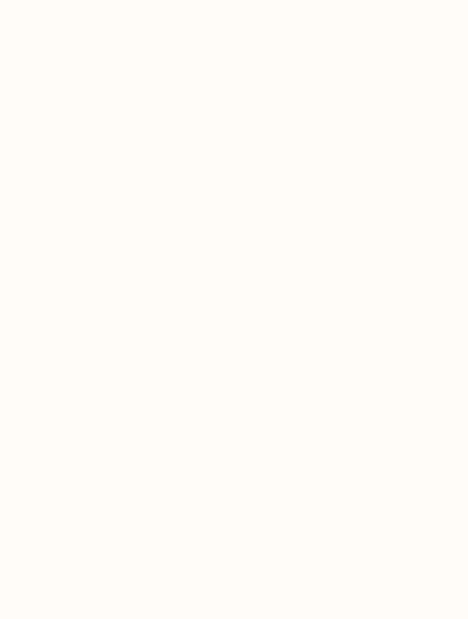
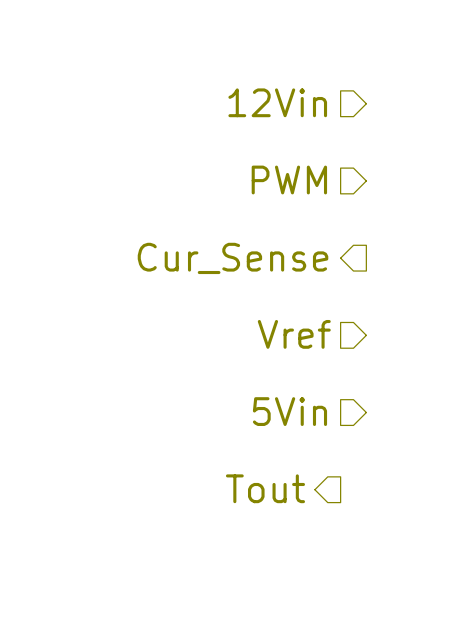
hierarchical label: none -> 12Vin (277, 102)
hierarchical label: none -> PWM (289, 180)
hierarchical label: none -> Cur_Sense (233, 258)
hierarchical label: none -> Vref (294, 334)
hierarchical label: none -> 5Vin (289, 411)
hierarchical label: none -> Tout (265, 488)

